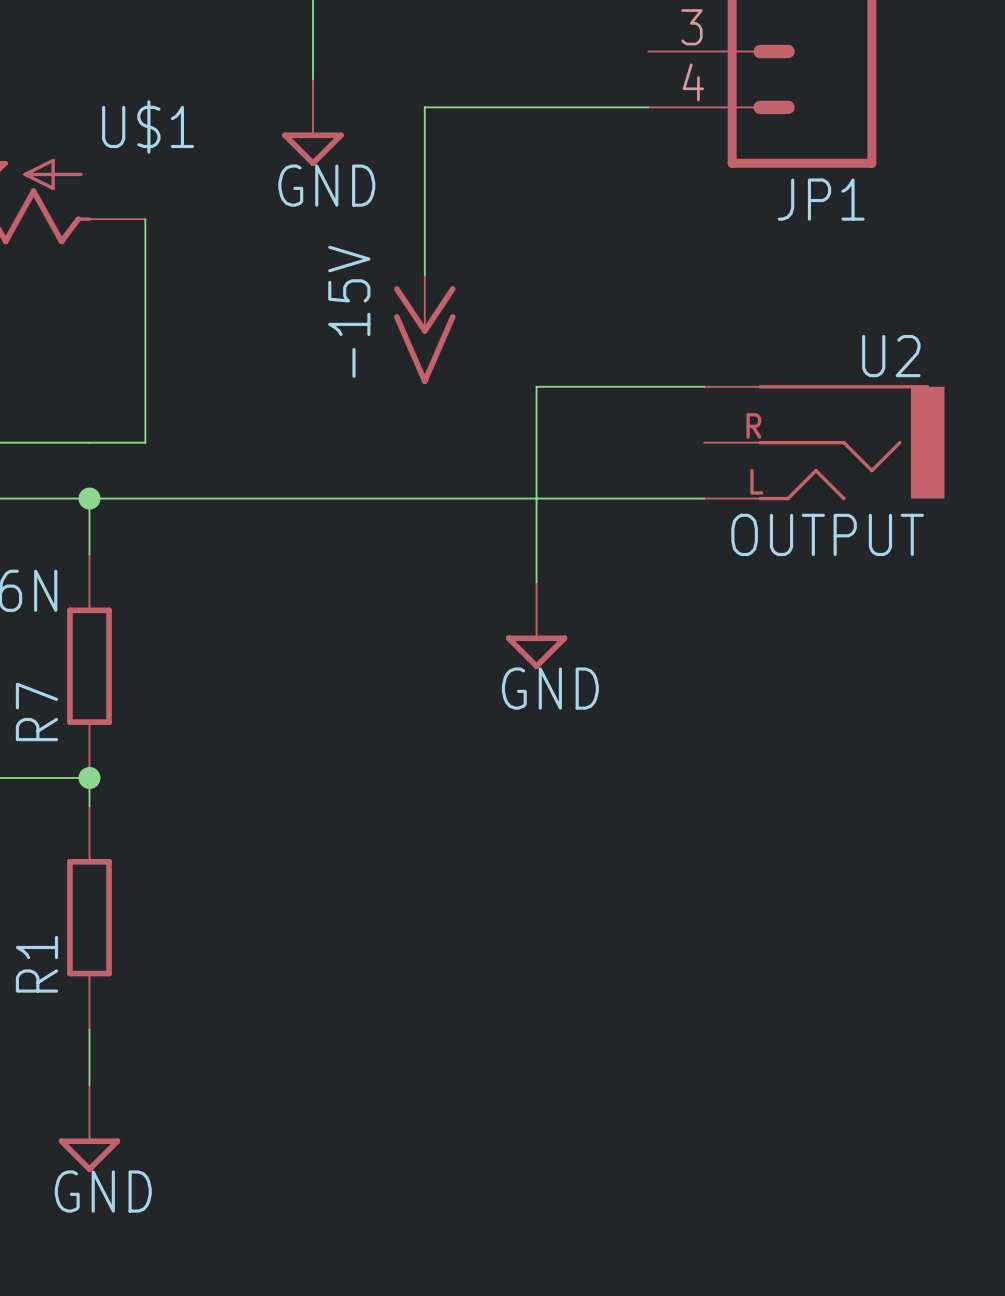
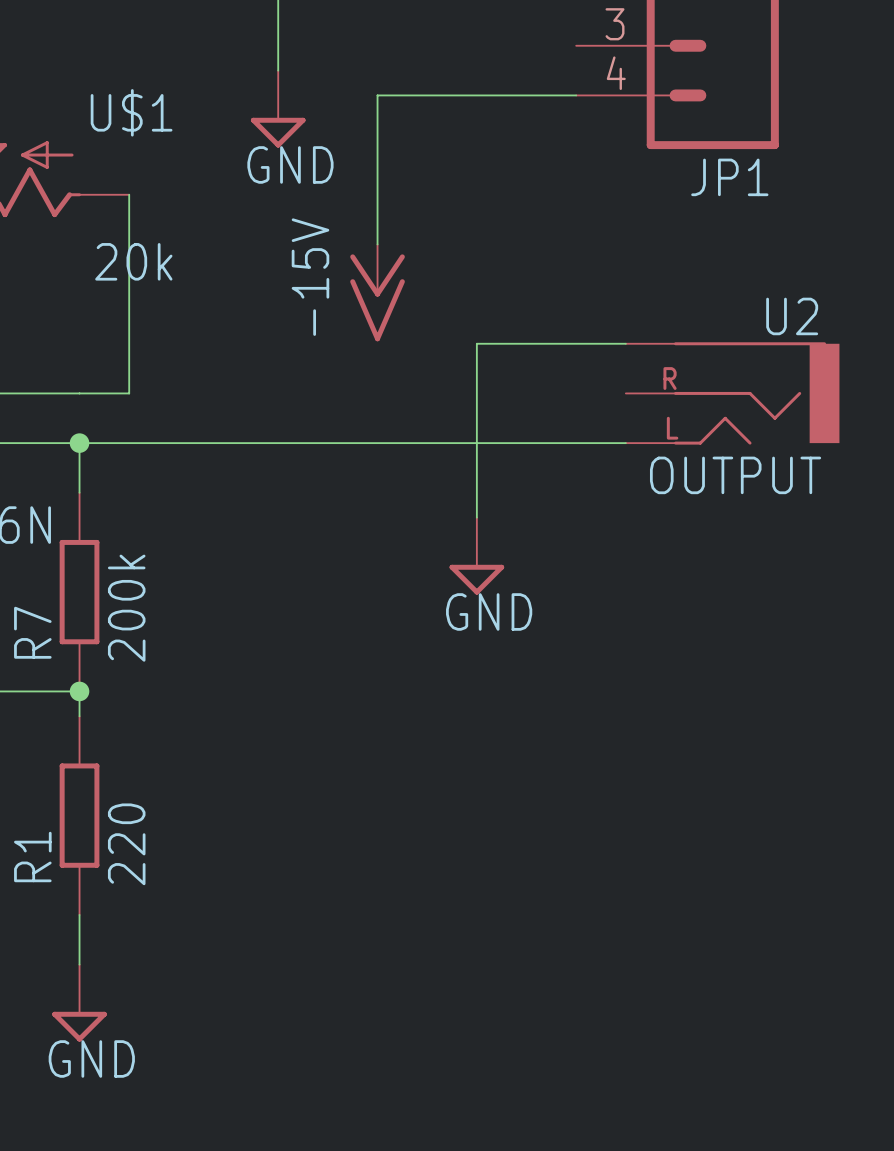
U$1 value: none -> 20k (133, 261)
R7 value: none -> 200k (126, 608)
R1 value: none -> 220 (126, 844)

